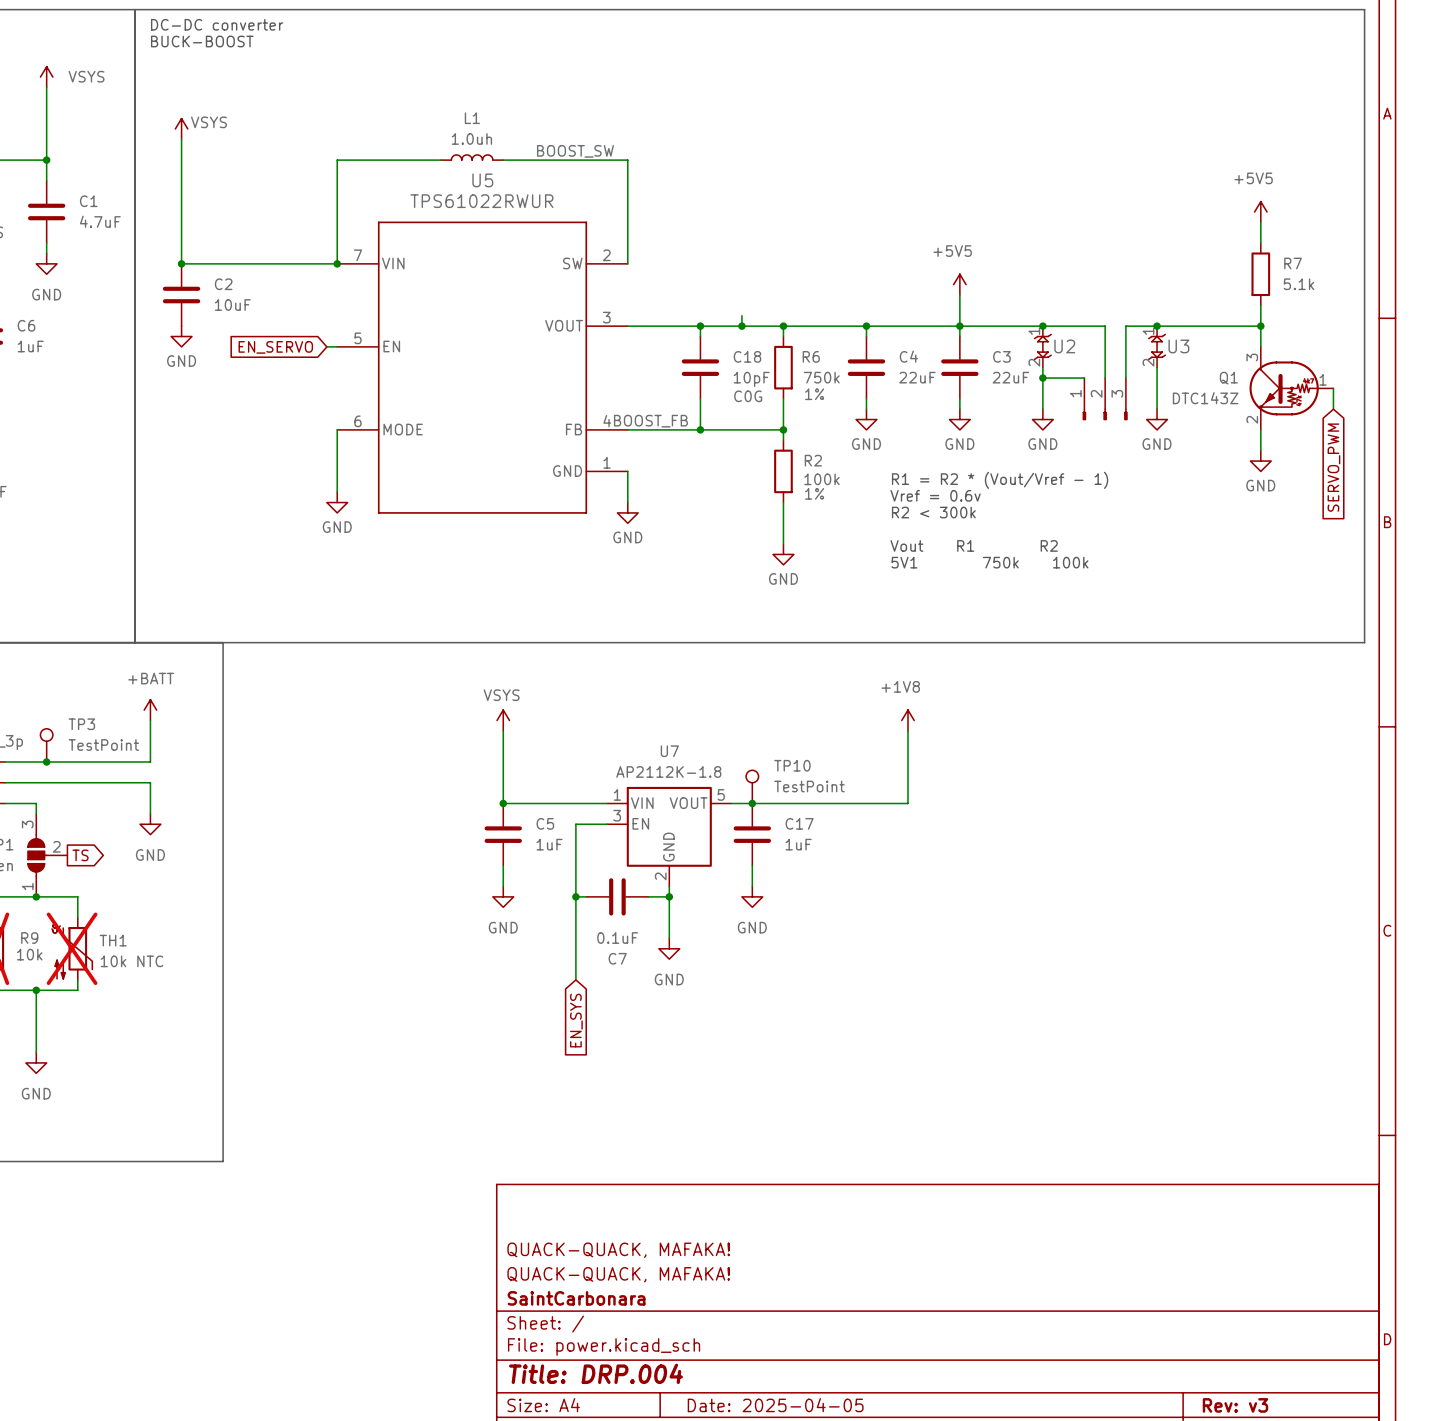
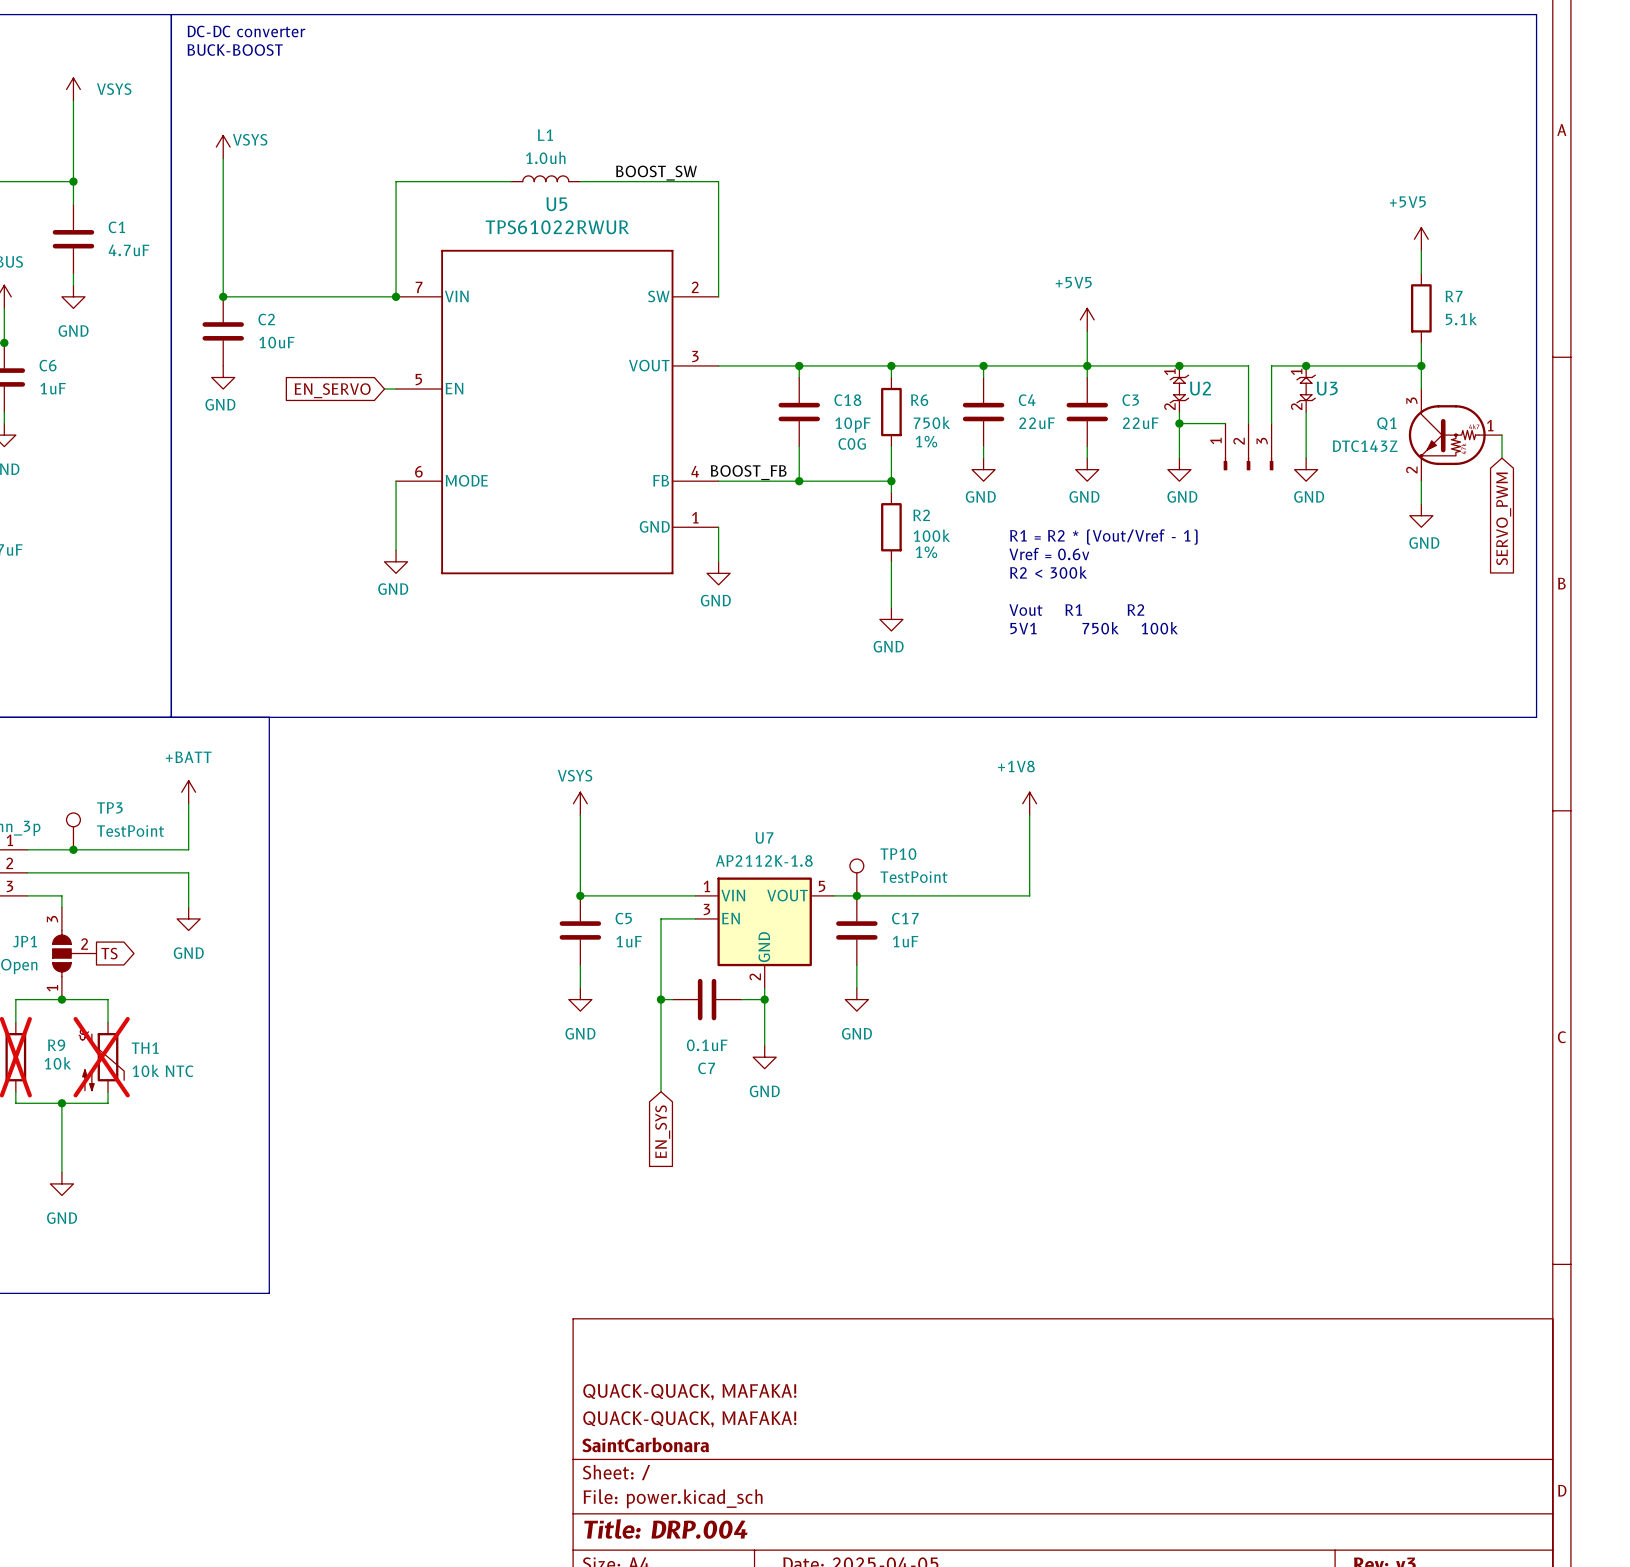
wire: (741, 315) (741, 326) -> none
junction: (741, 326) -> none

